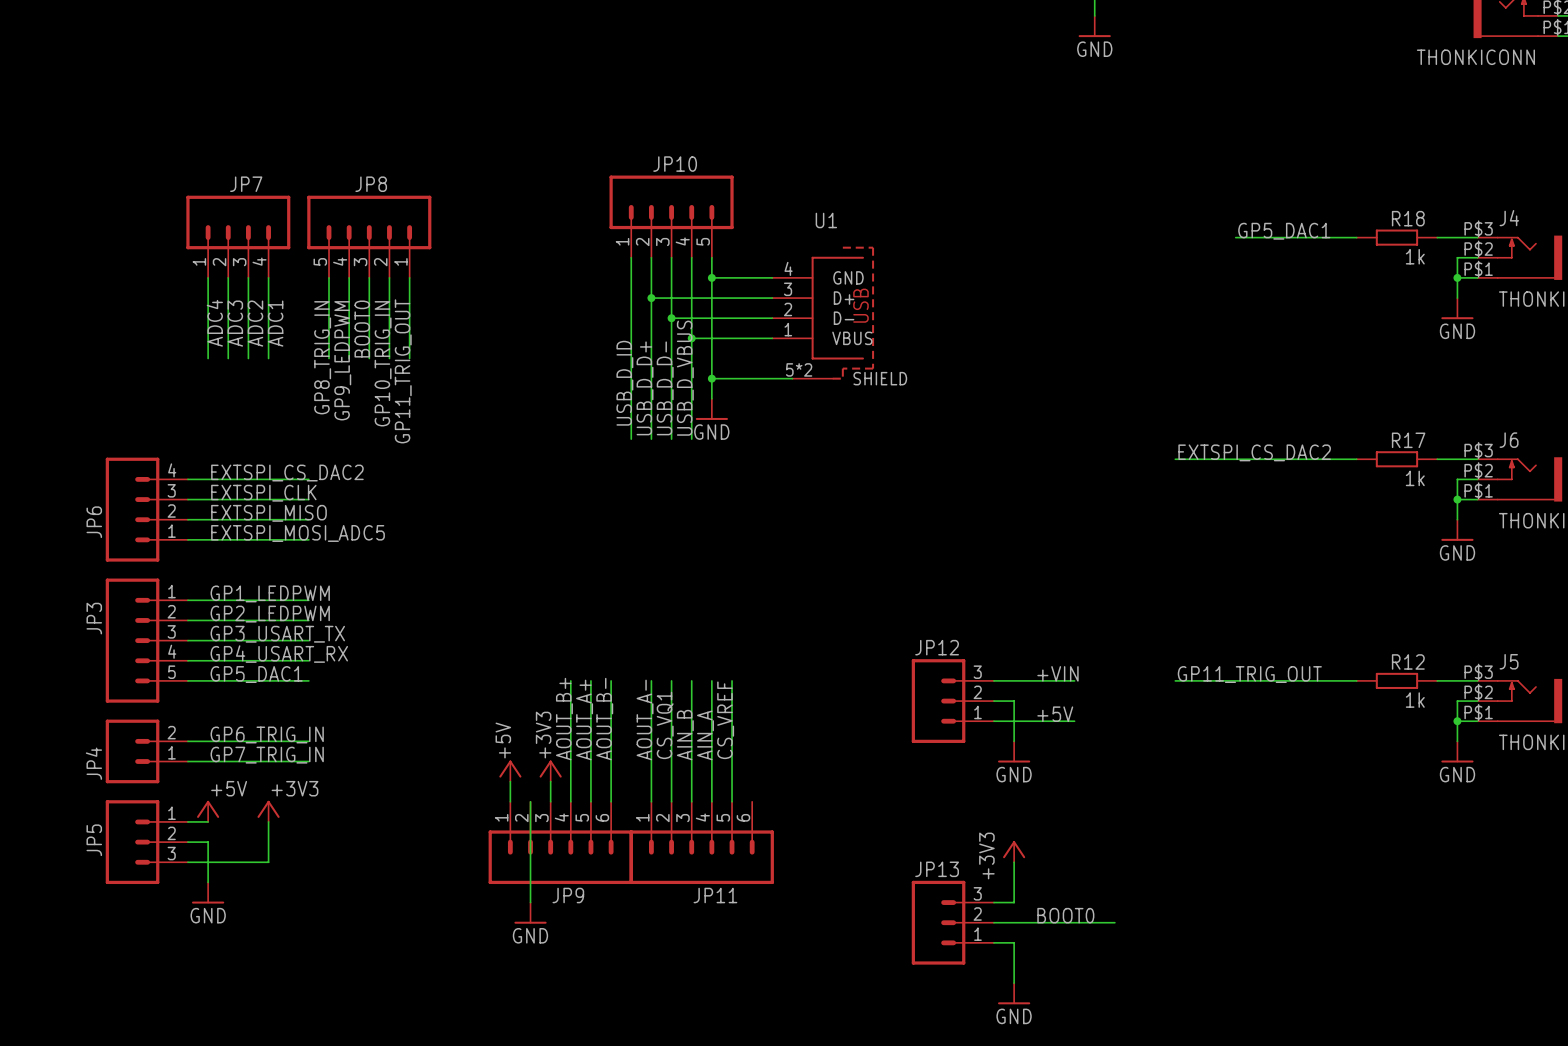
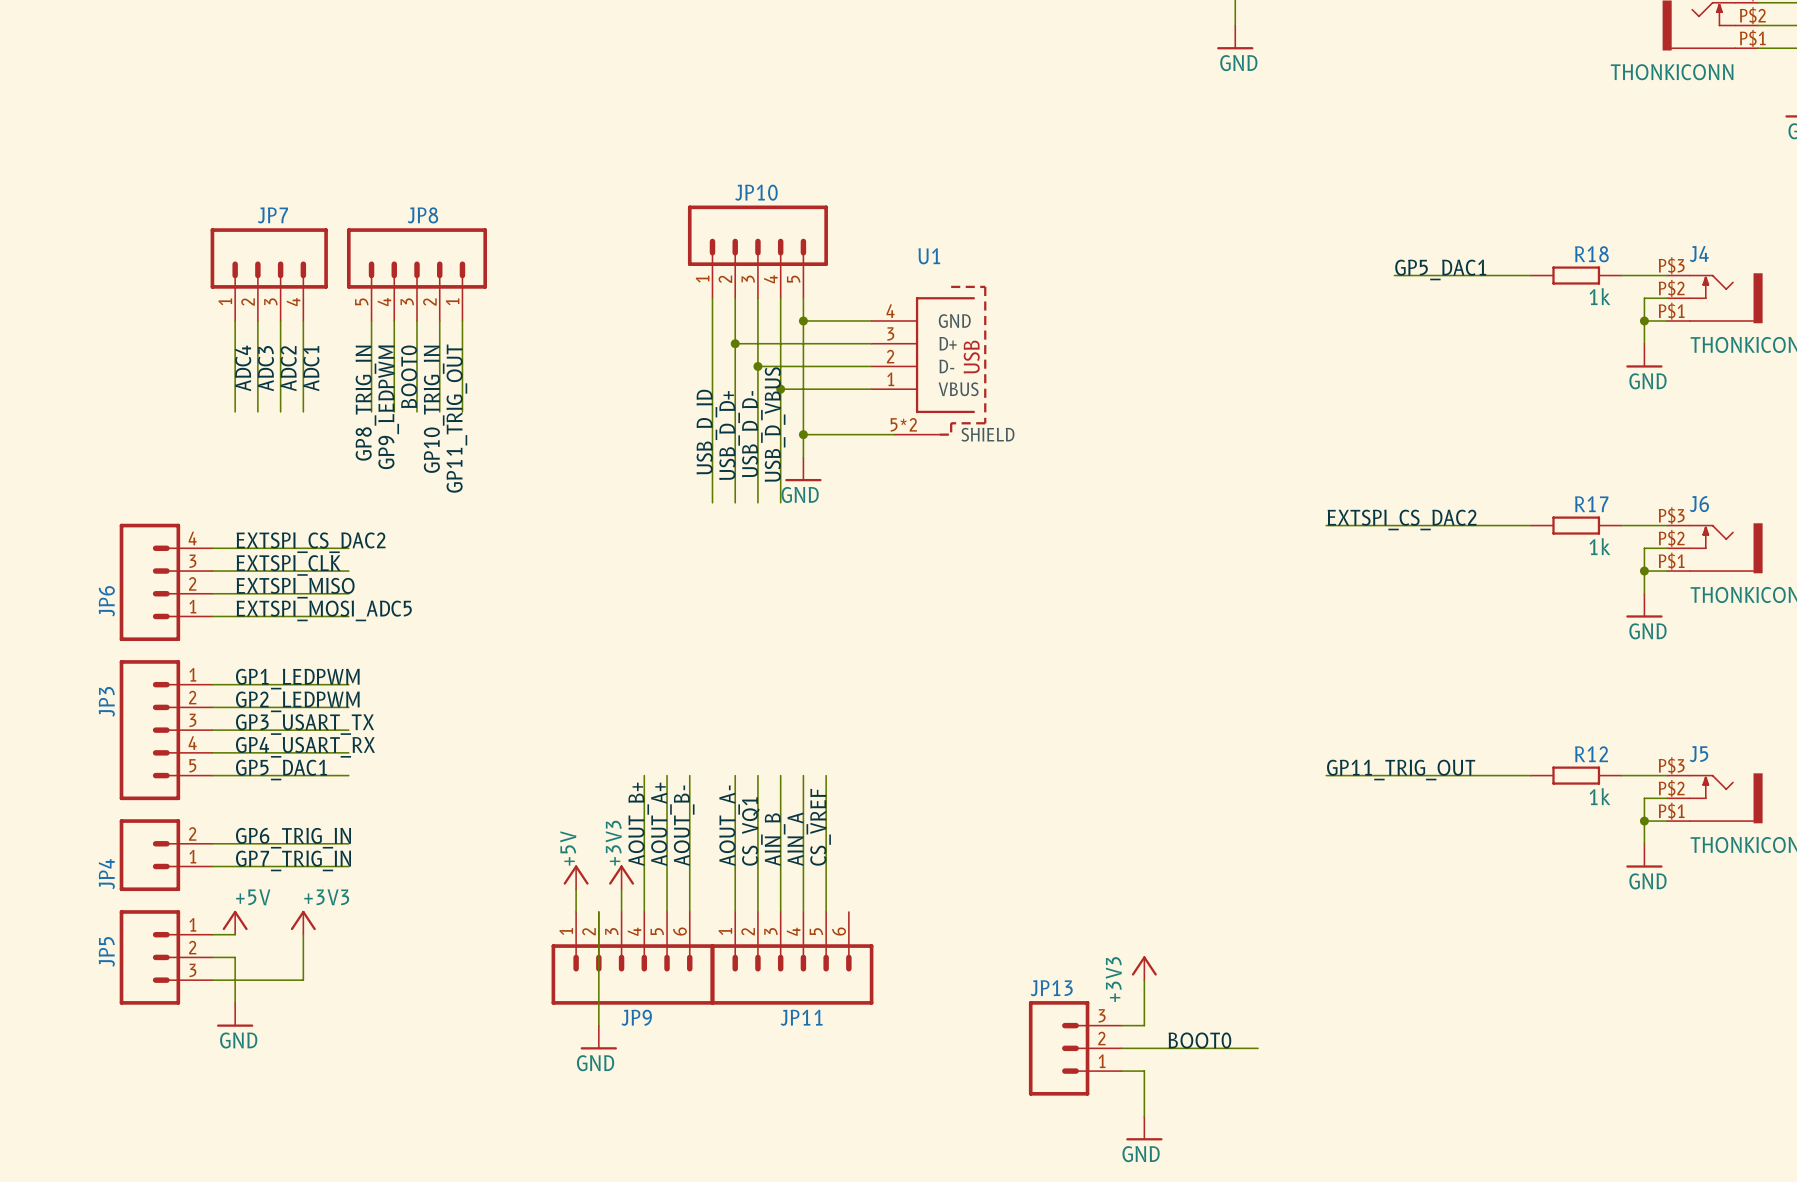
label: +VIN (1057, 673) -> none
wire: (993, 680) (1074, 680) -> none
JP12: (952, 701) -> none
wire: (993, 701) (1014, 701) (1014, 741) -> none
label: +5V (1055, 714) -> none
wire: (993, 721) (1074, 721) -> none
power symbol: GND (1014, 751) -> none

